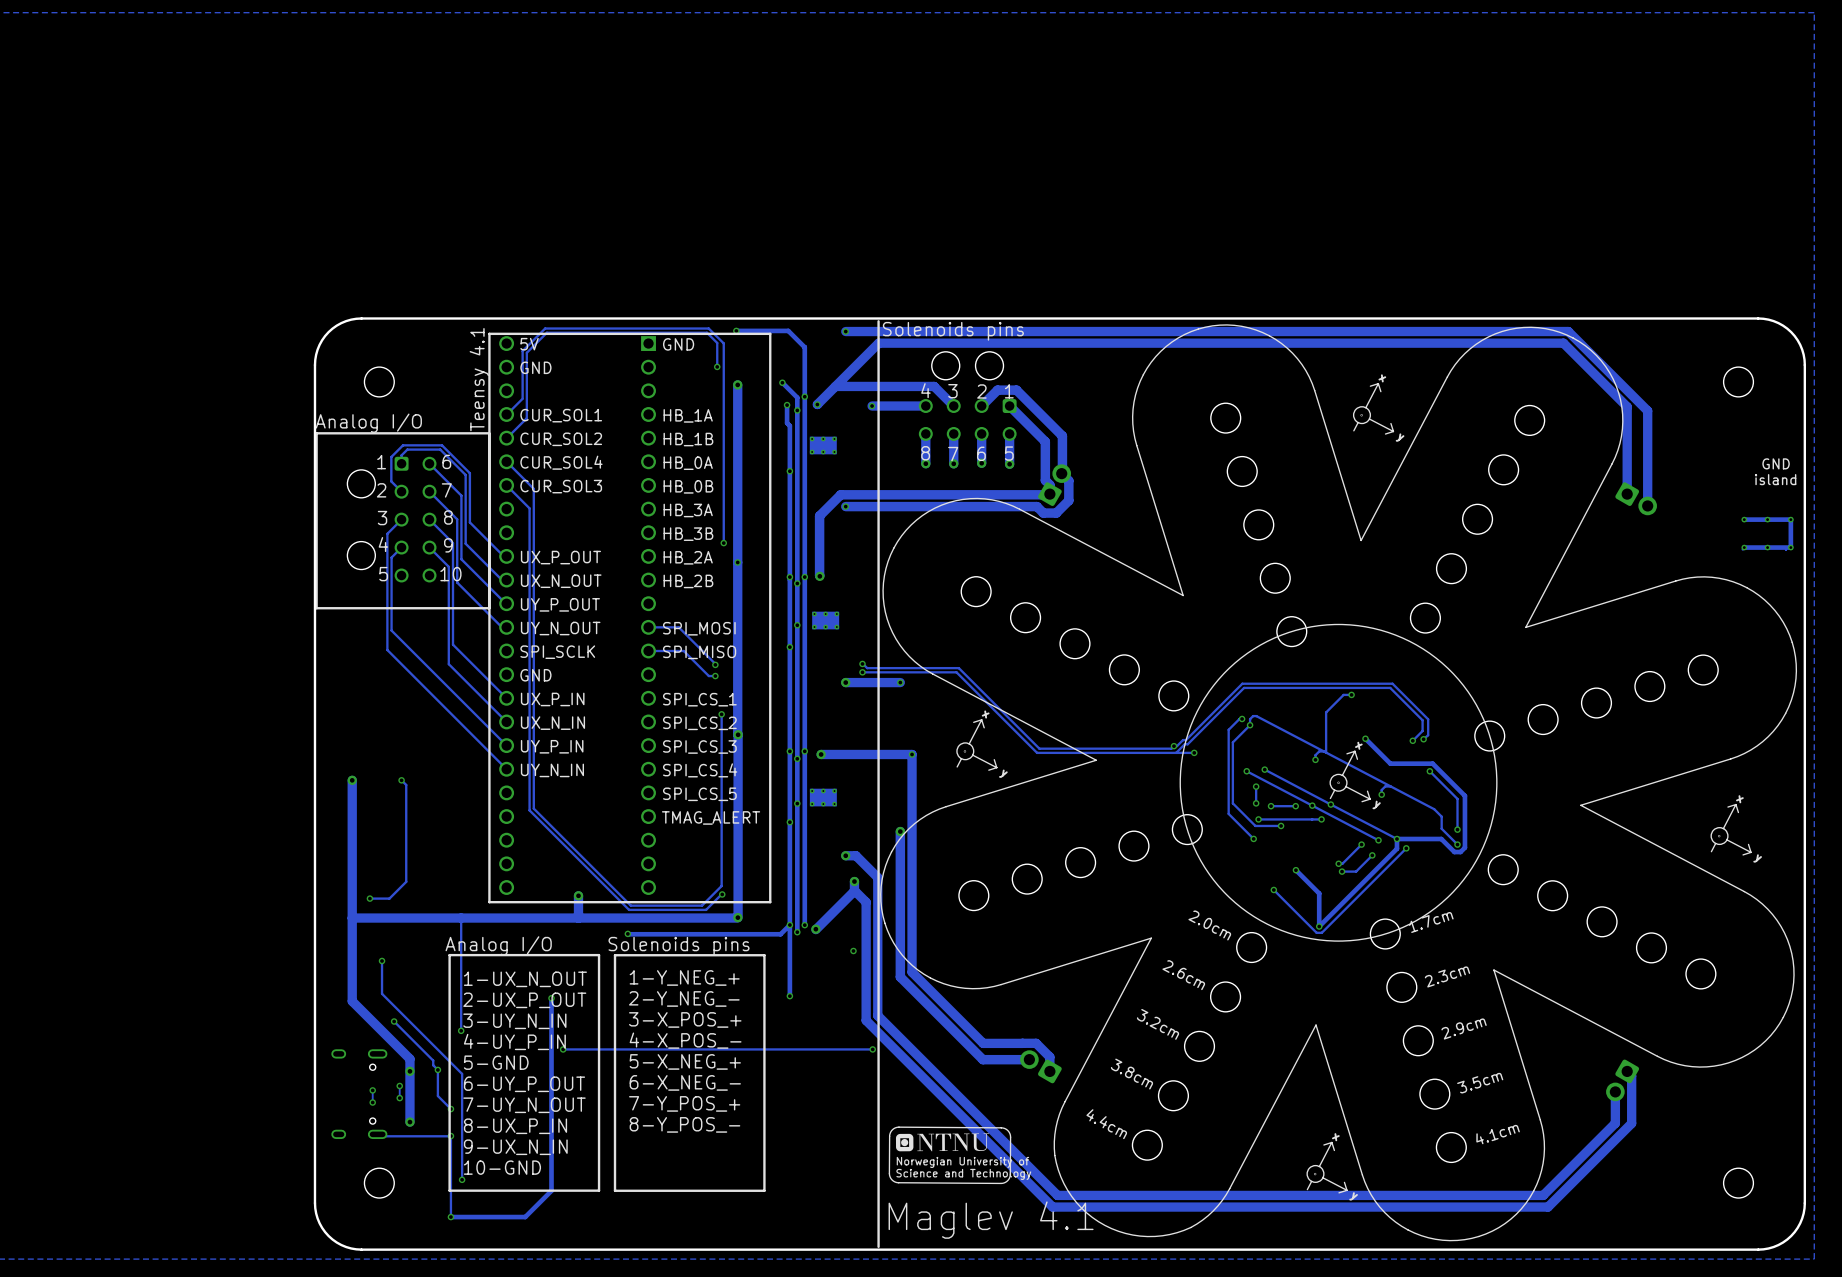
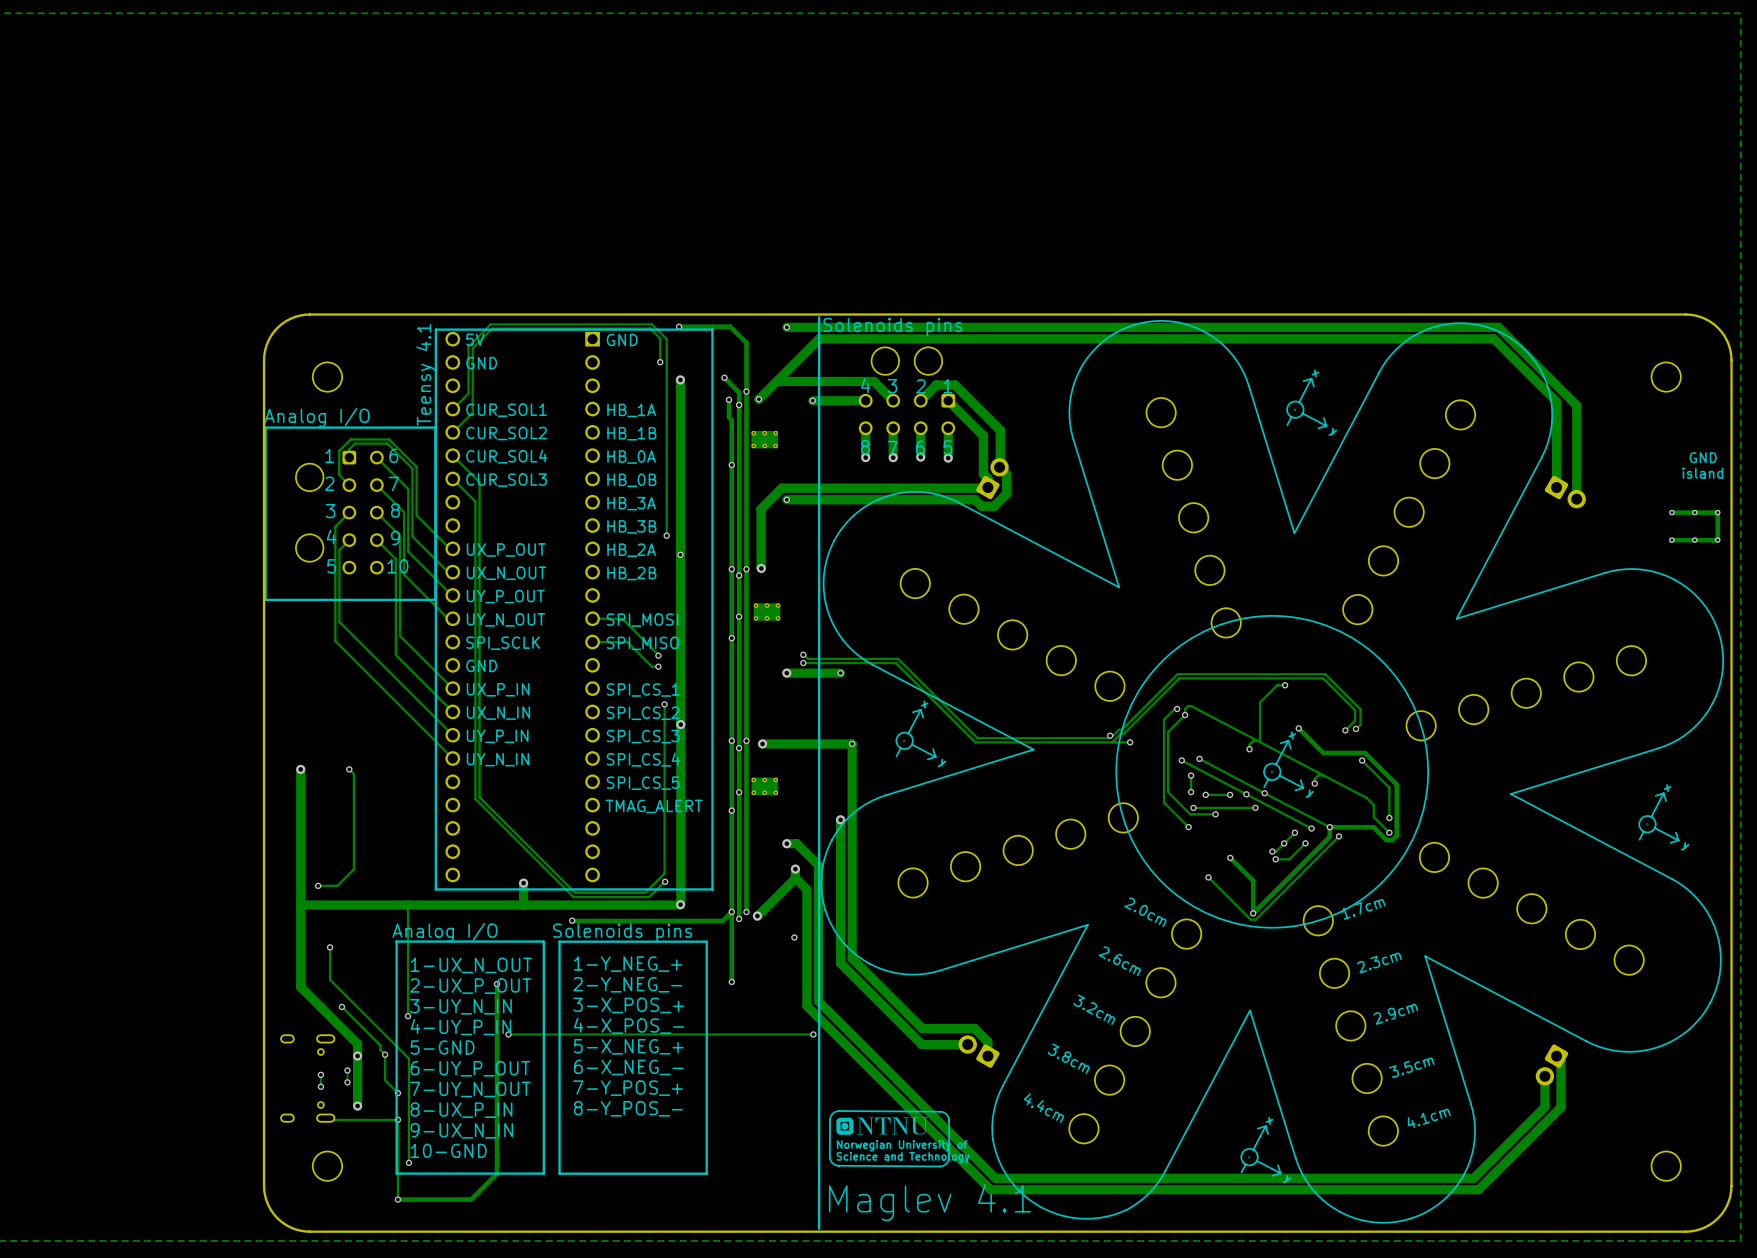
via: none -> (1284, 843)

